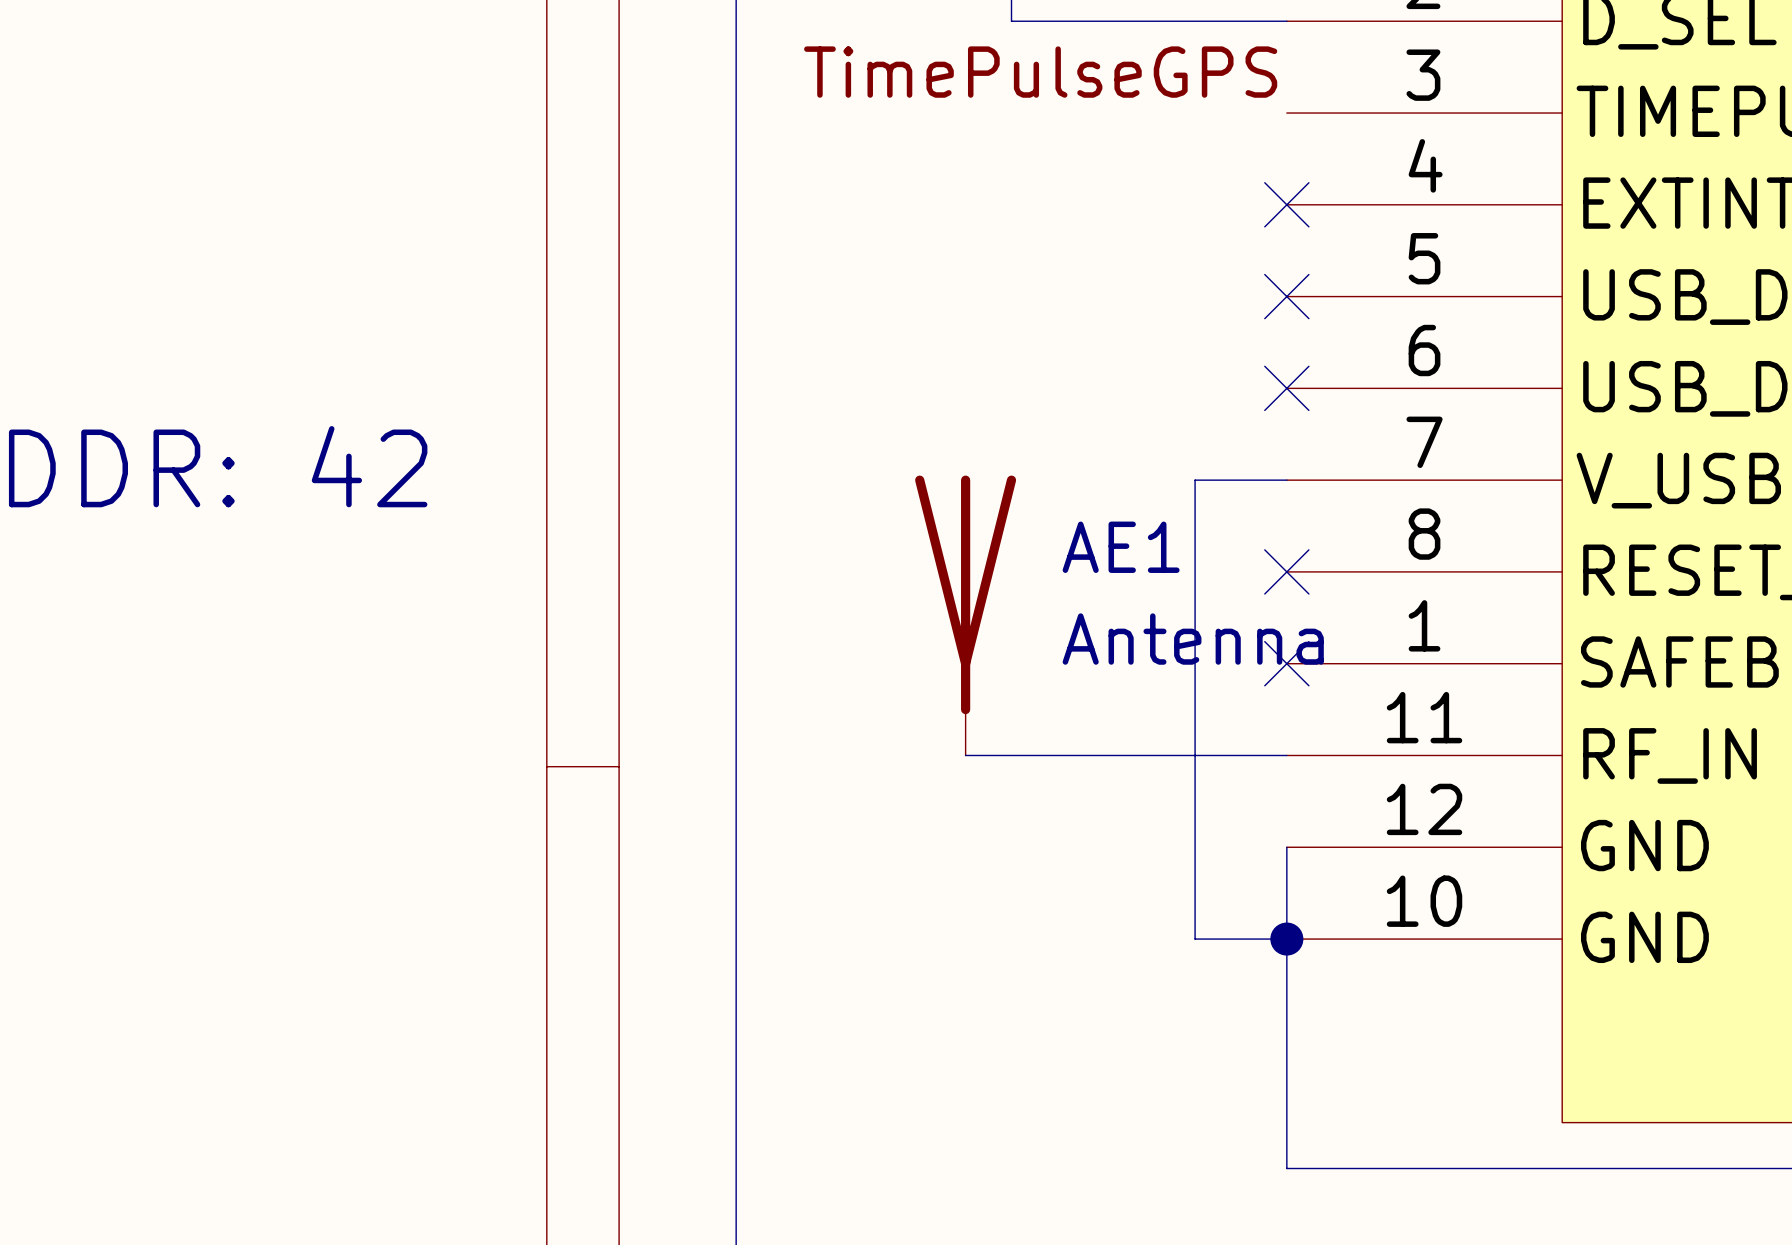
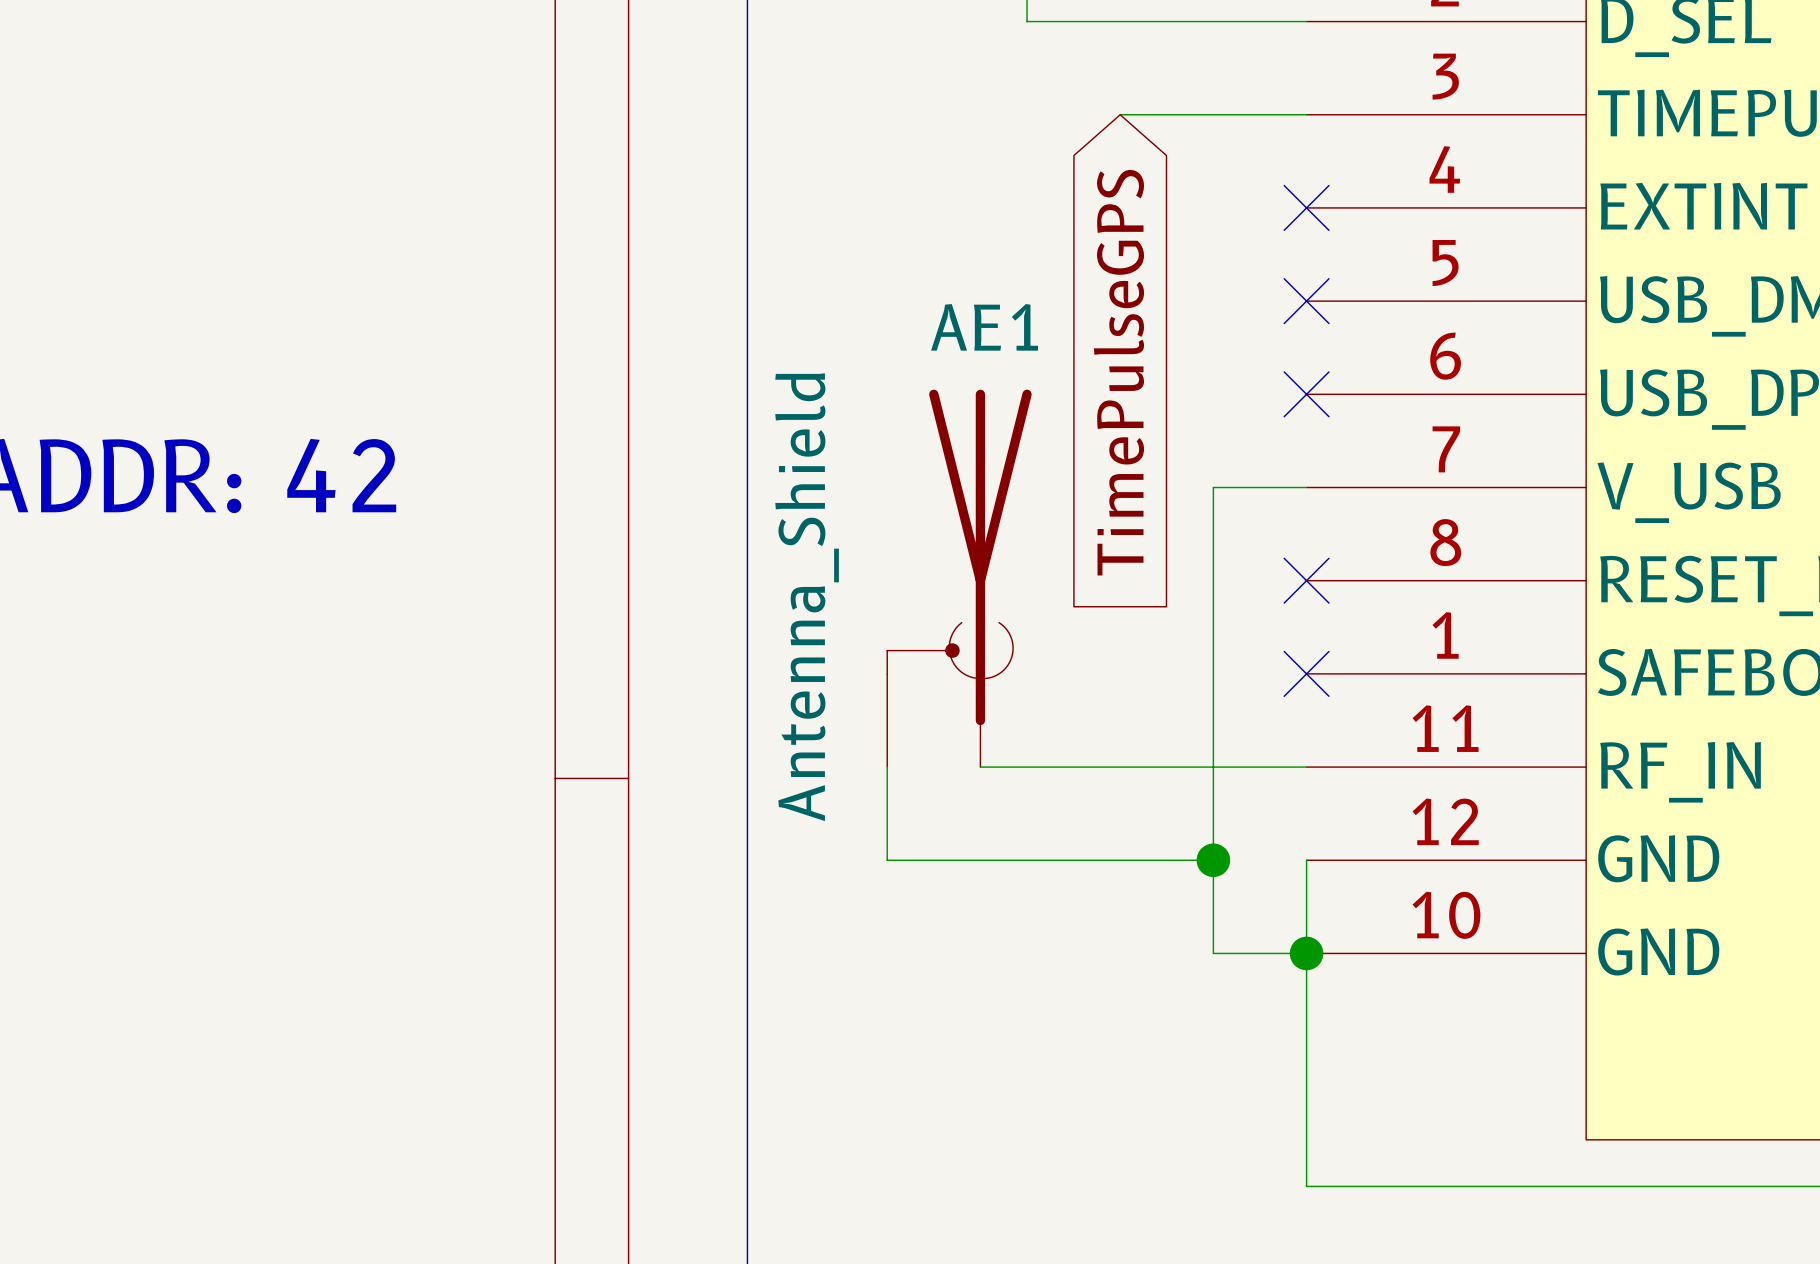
label: TimePulseGPS (1040, 72) -> none
wire: none -> (1120, 114) (1306, 114)
global label: none -> TimePulseGPS (1118, 372)
AE1 symbol: [915, 475, 1017, 756] -> [887, 389, 1032, 768]
AE1 name position: AE1 (1121, 547) -> AE1 (984, 327)
AE1 value: Antenna (1193, 639) -> Antenna_Shield (807, 597)
wire: none -> (887, 767) (887, 860) (1213, 860)
junction: none -> (1213, 860)

